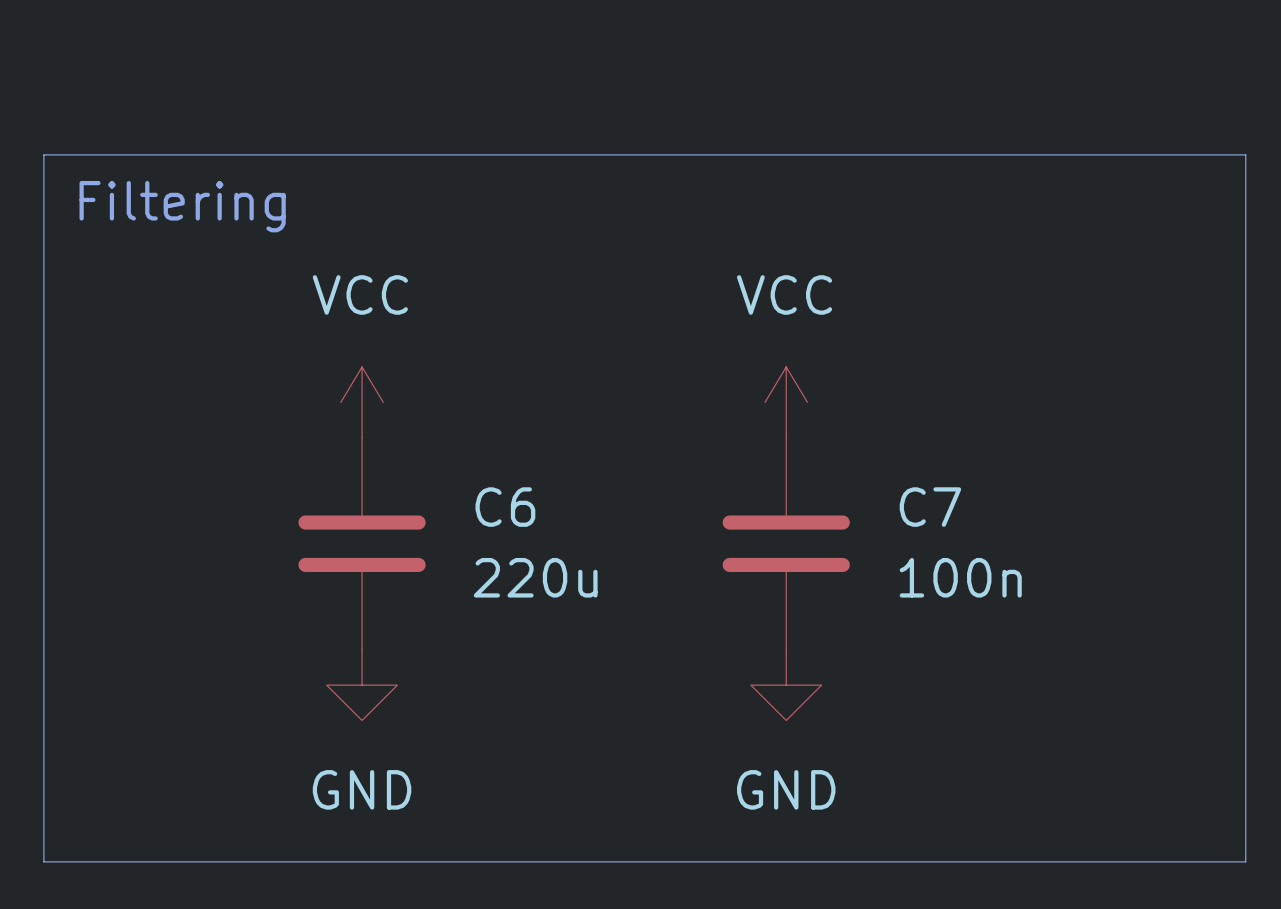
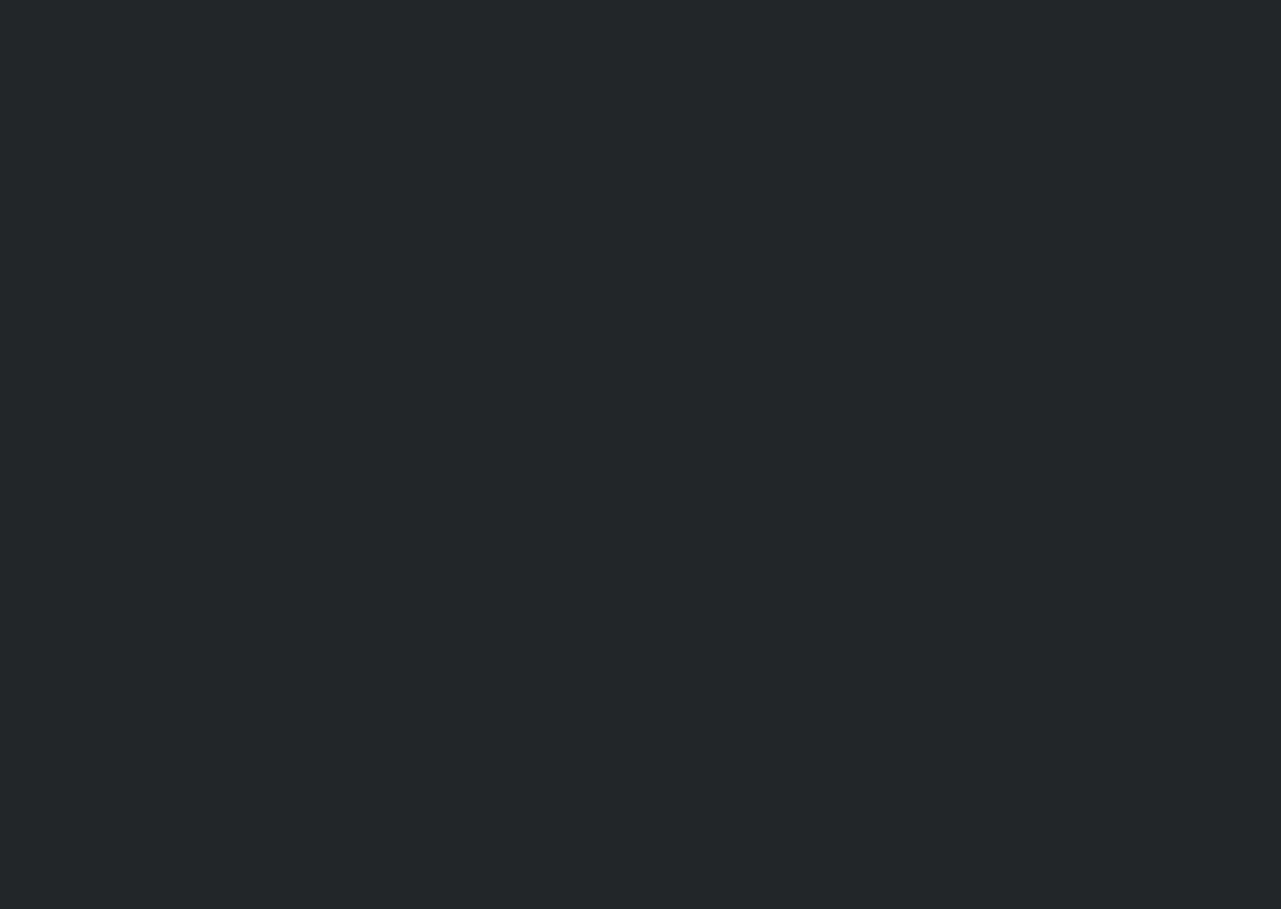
line: (43, 154) (1245, 154) (1245, 861) (43, 861) (43, 154) -> none
text: Filtering (182, 206) -> none
power symbol: VCC (362, 402) -> none
power symbol: VCC (786, 402) -> none
C6: 220u (362, 543) -> none
C7: 100n (786, 543) -> none
power symbol: GND (362, 685) -> none
power symbol: GND (786, 685) -> none

